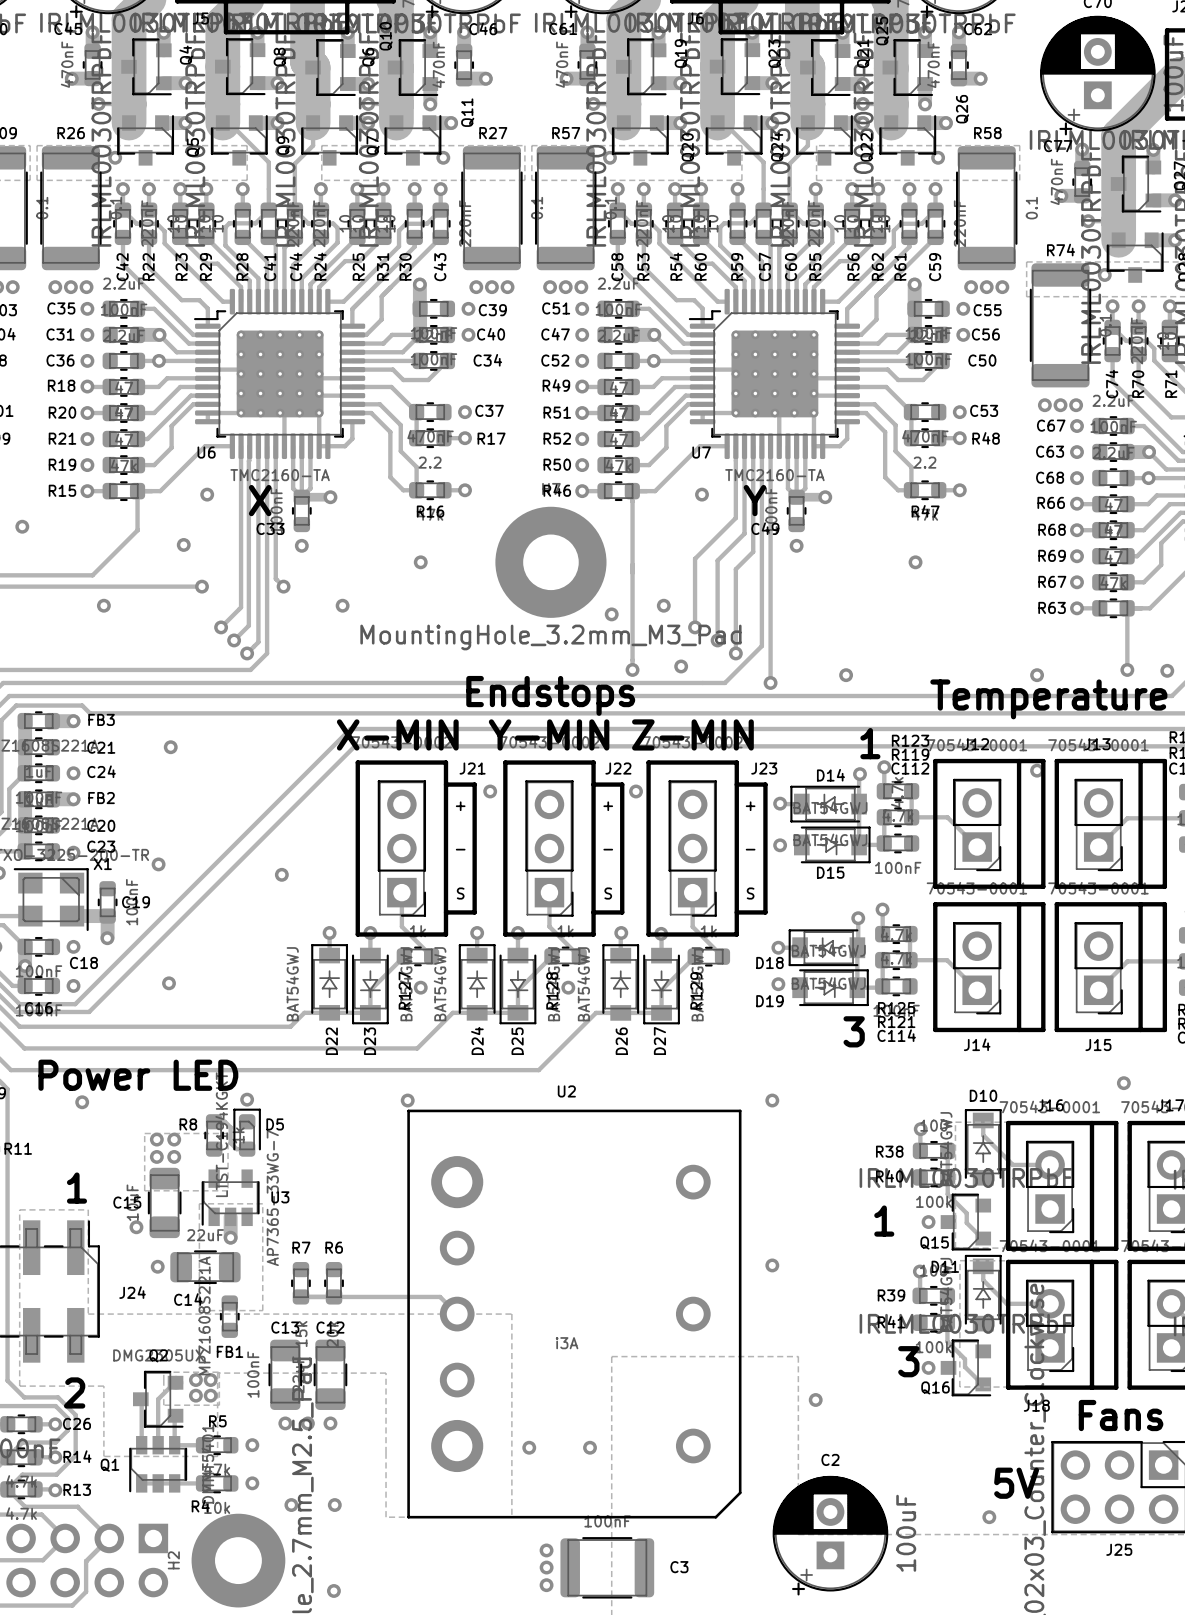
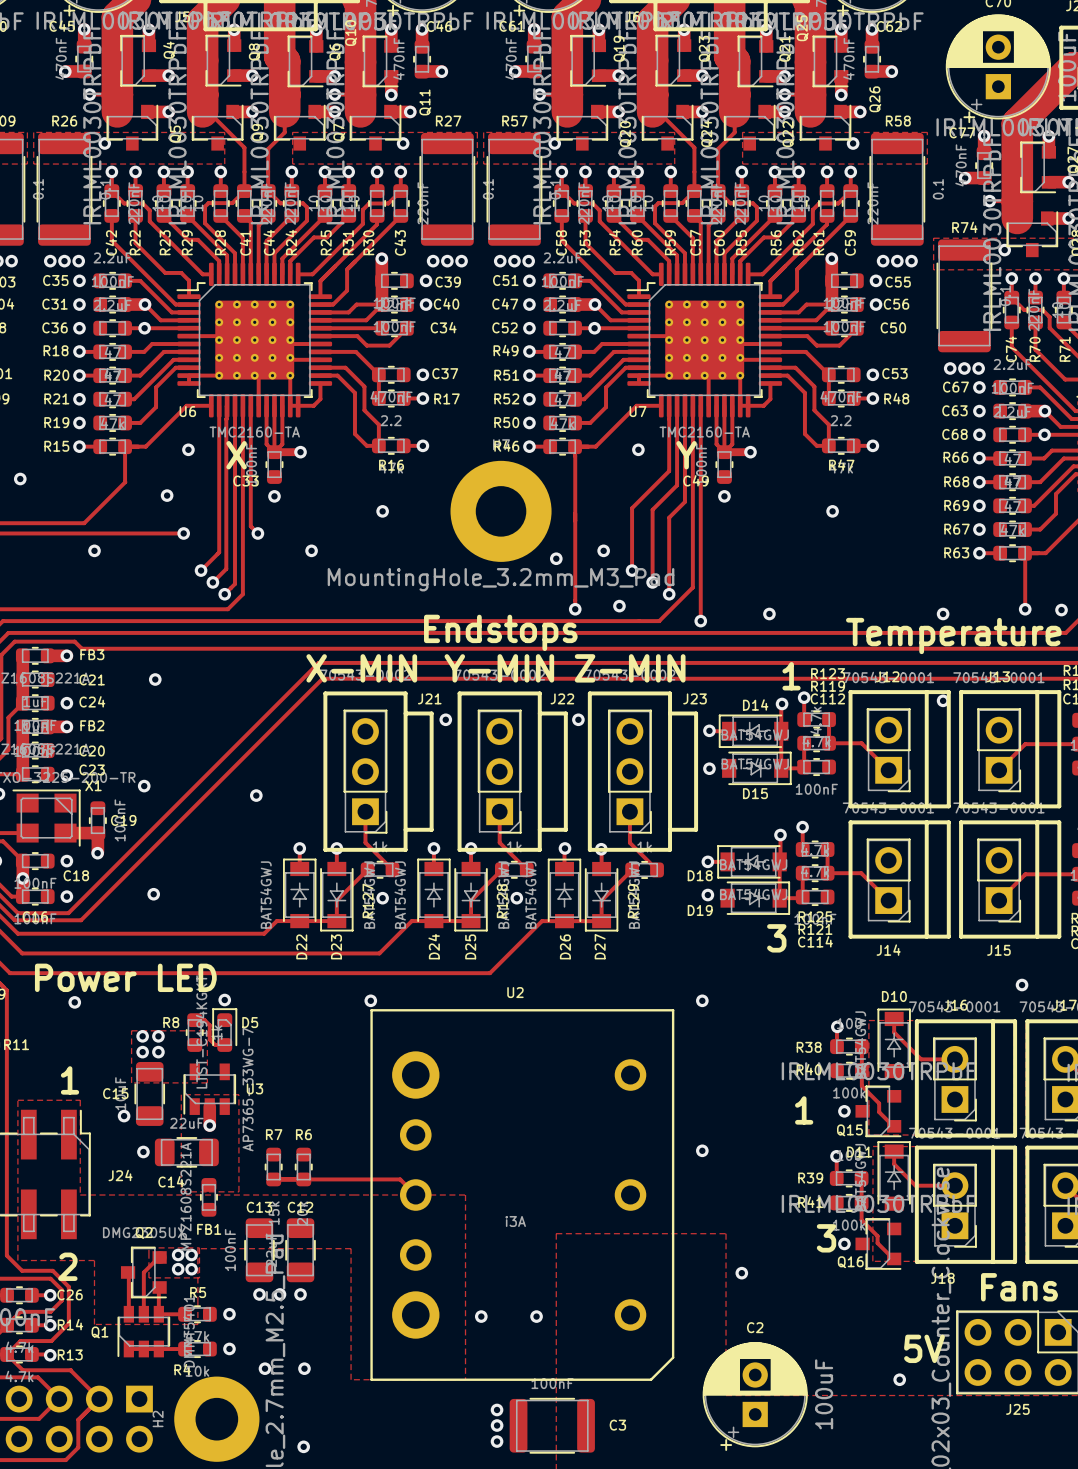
text: + (460, 806) -> none
text: + (608, 806) -> none
text: + (750, 806) -> none
text: - (460, 849) -> none
text: - (608, 849) -> none
text: - (750, 849) -> none
text: S (460, 893) -> none
text: S (608, 893) -> none
text: S (750, 893) -> none

